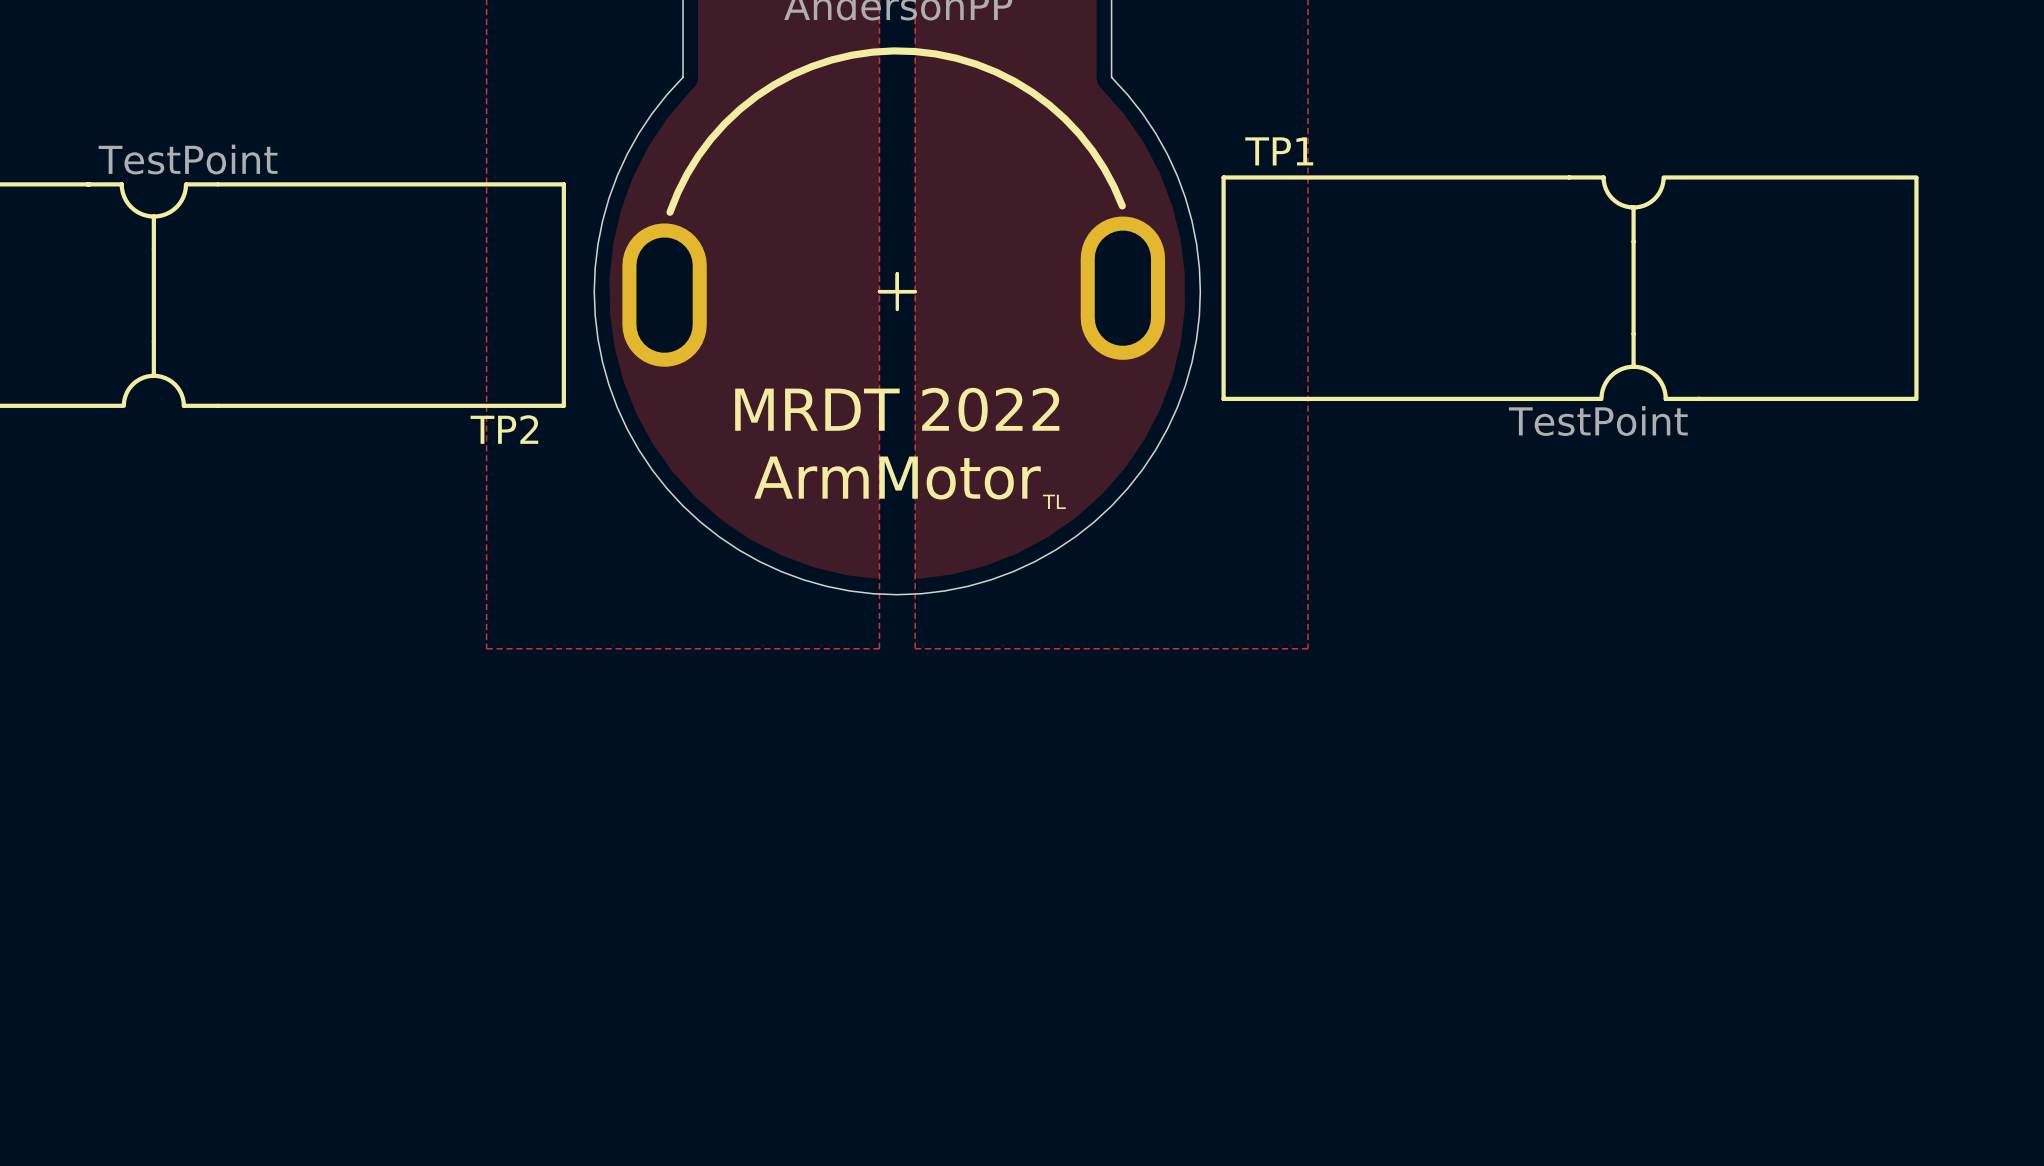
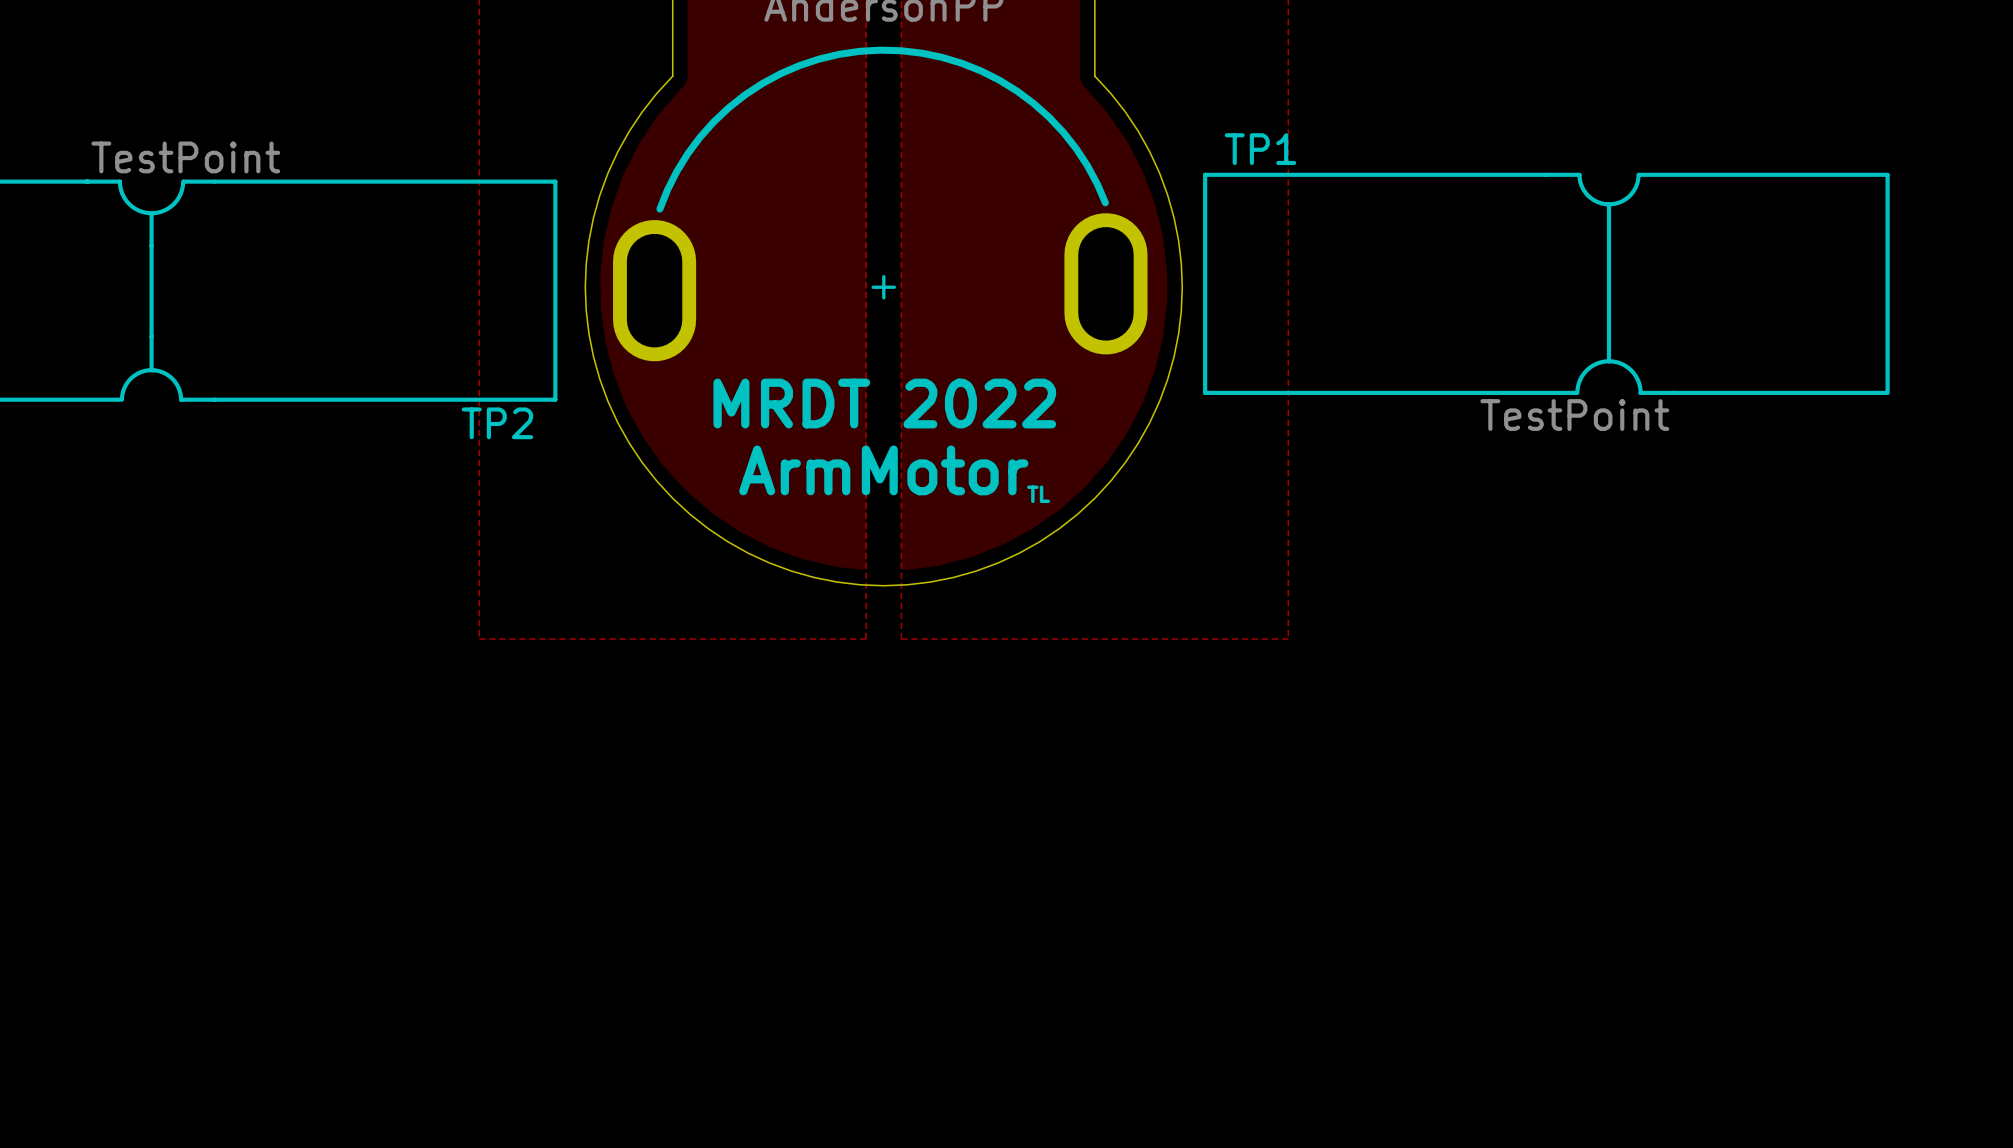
line: (897, 273) (897, 280) -> none
line: (879, 291) (886, 291) -> none
line: (908, 291) (915, 291) -> none
line: (897, 302) (897, 309) -> none

